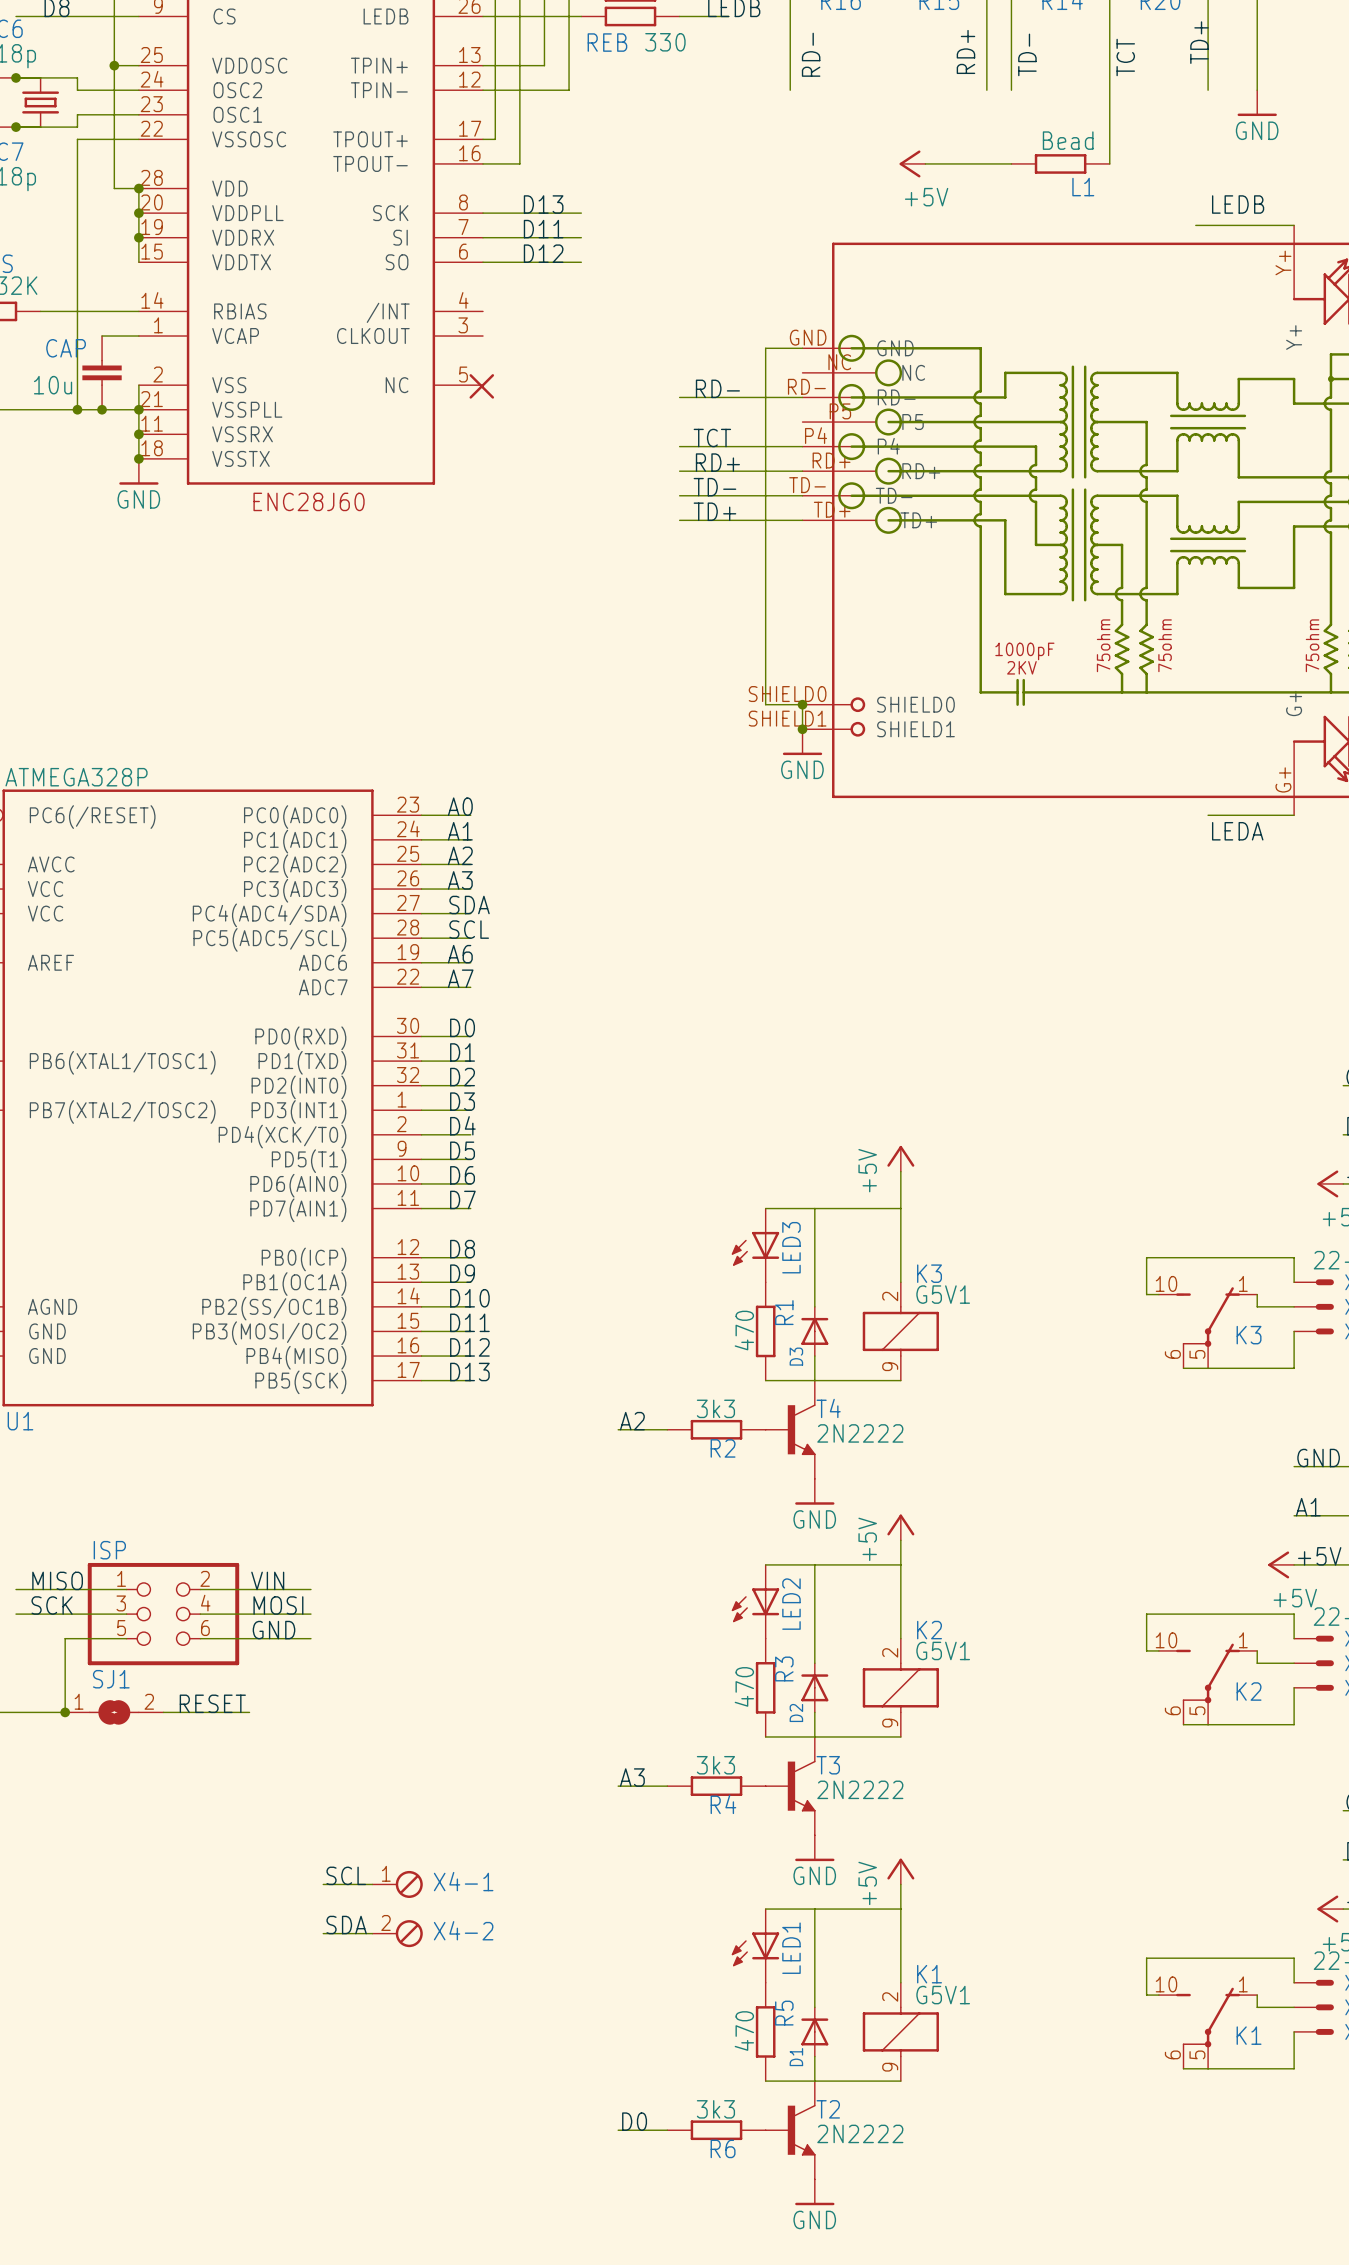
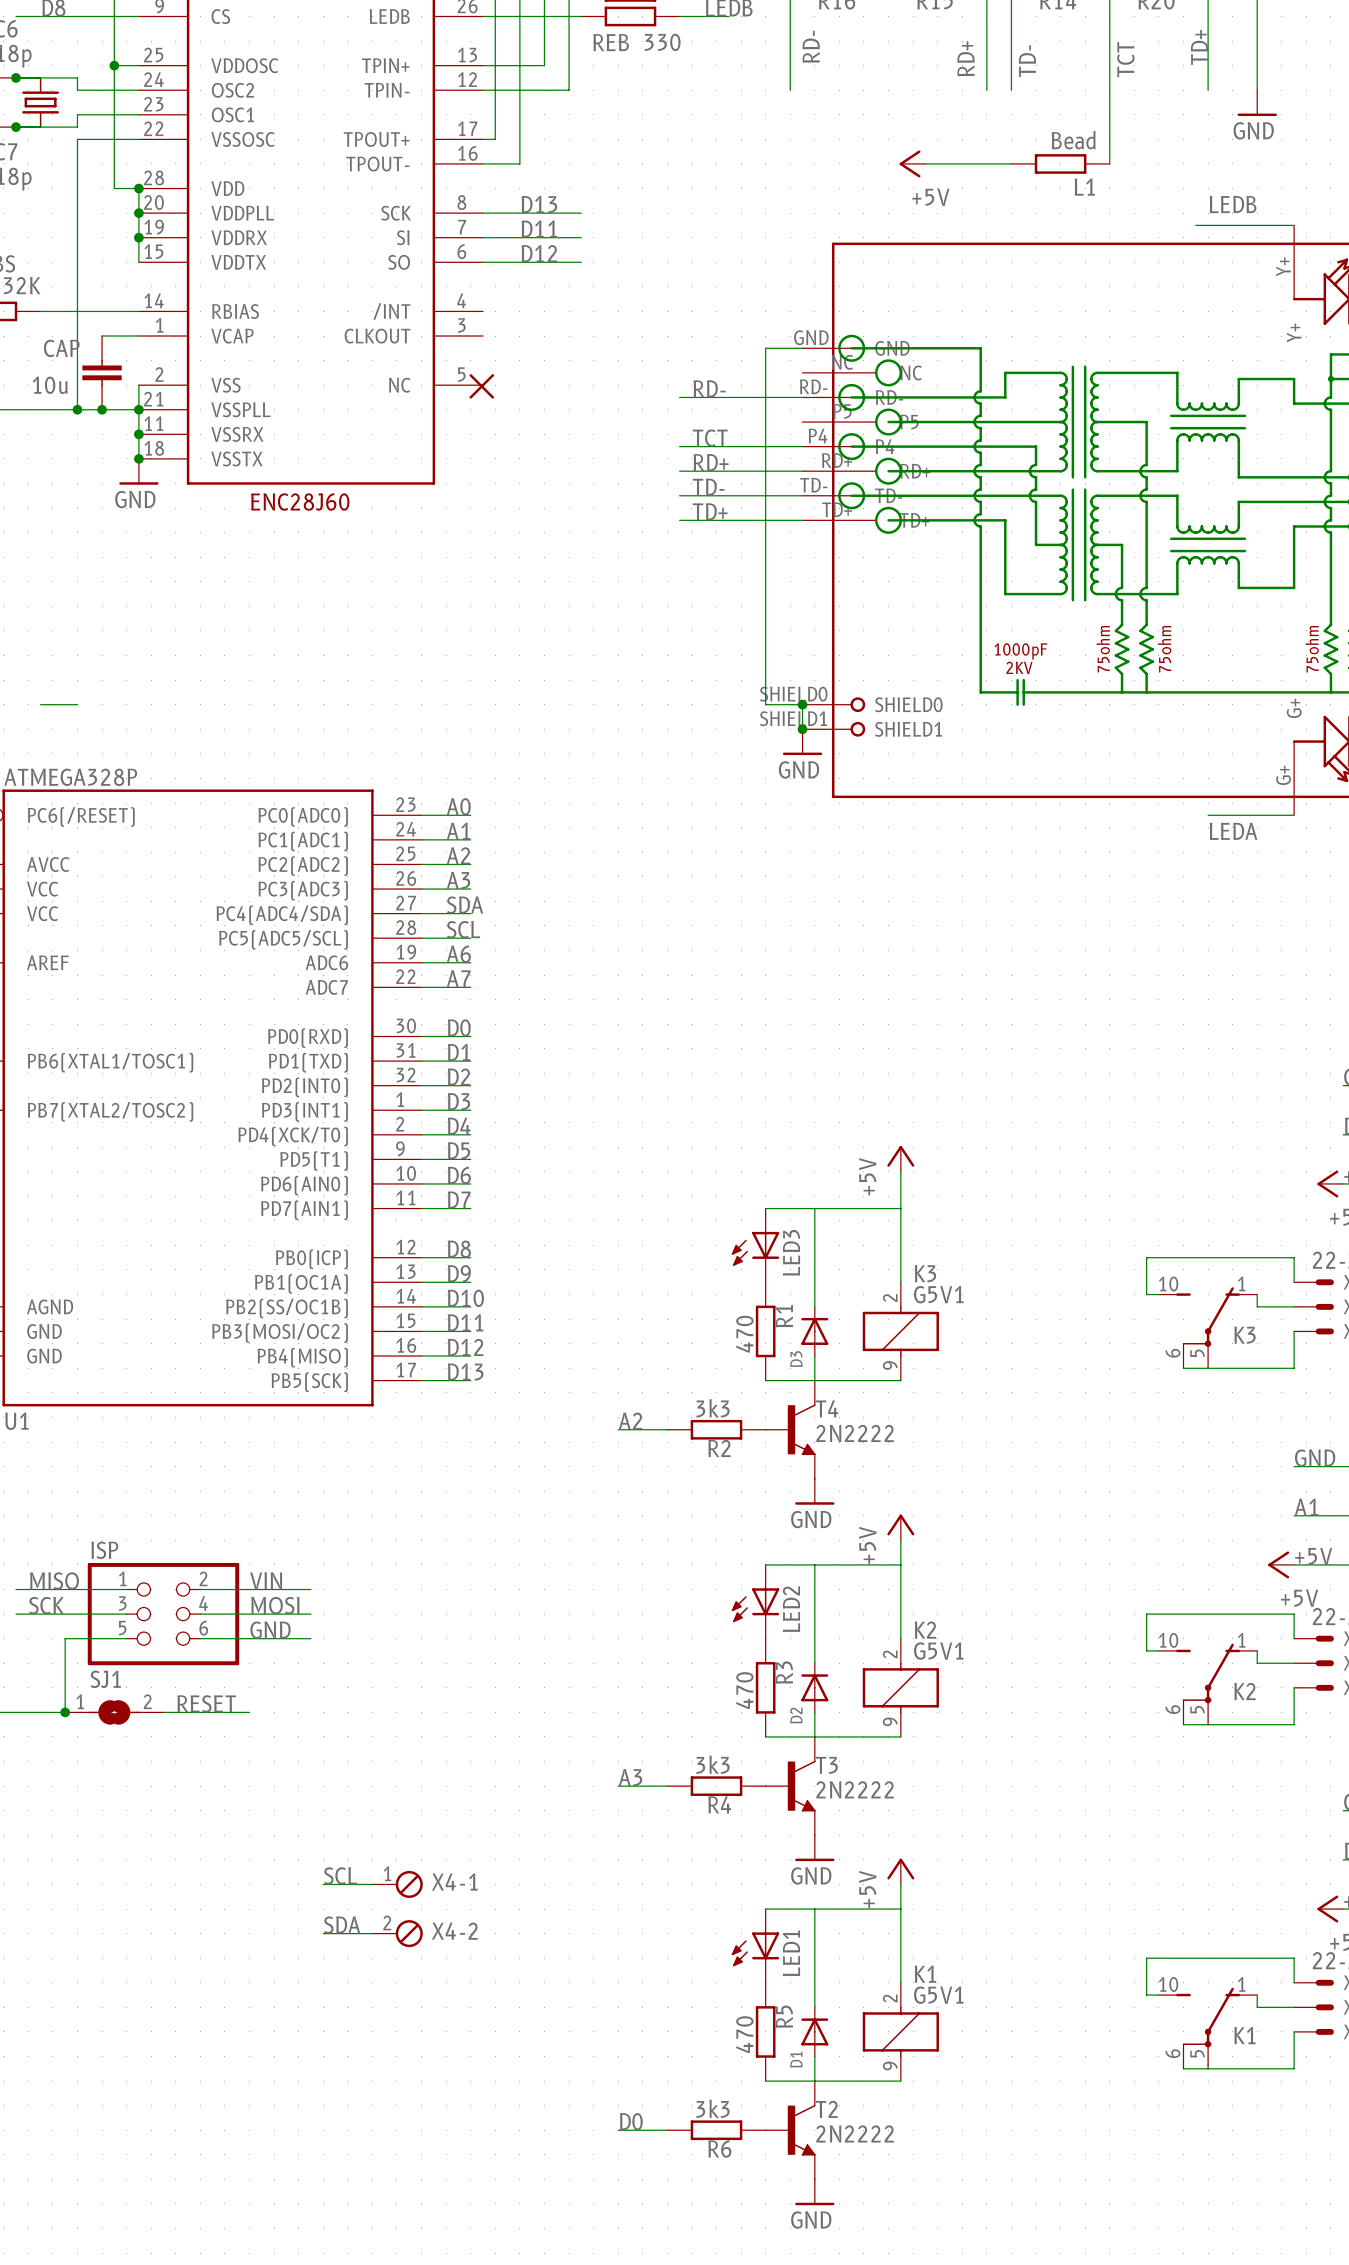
wire: none -> (40, 704) (77, 704)

